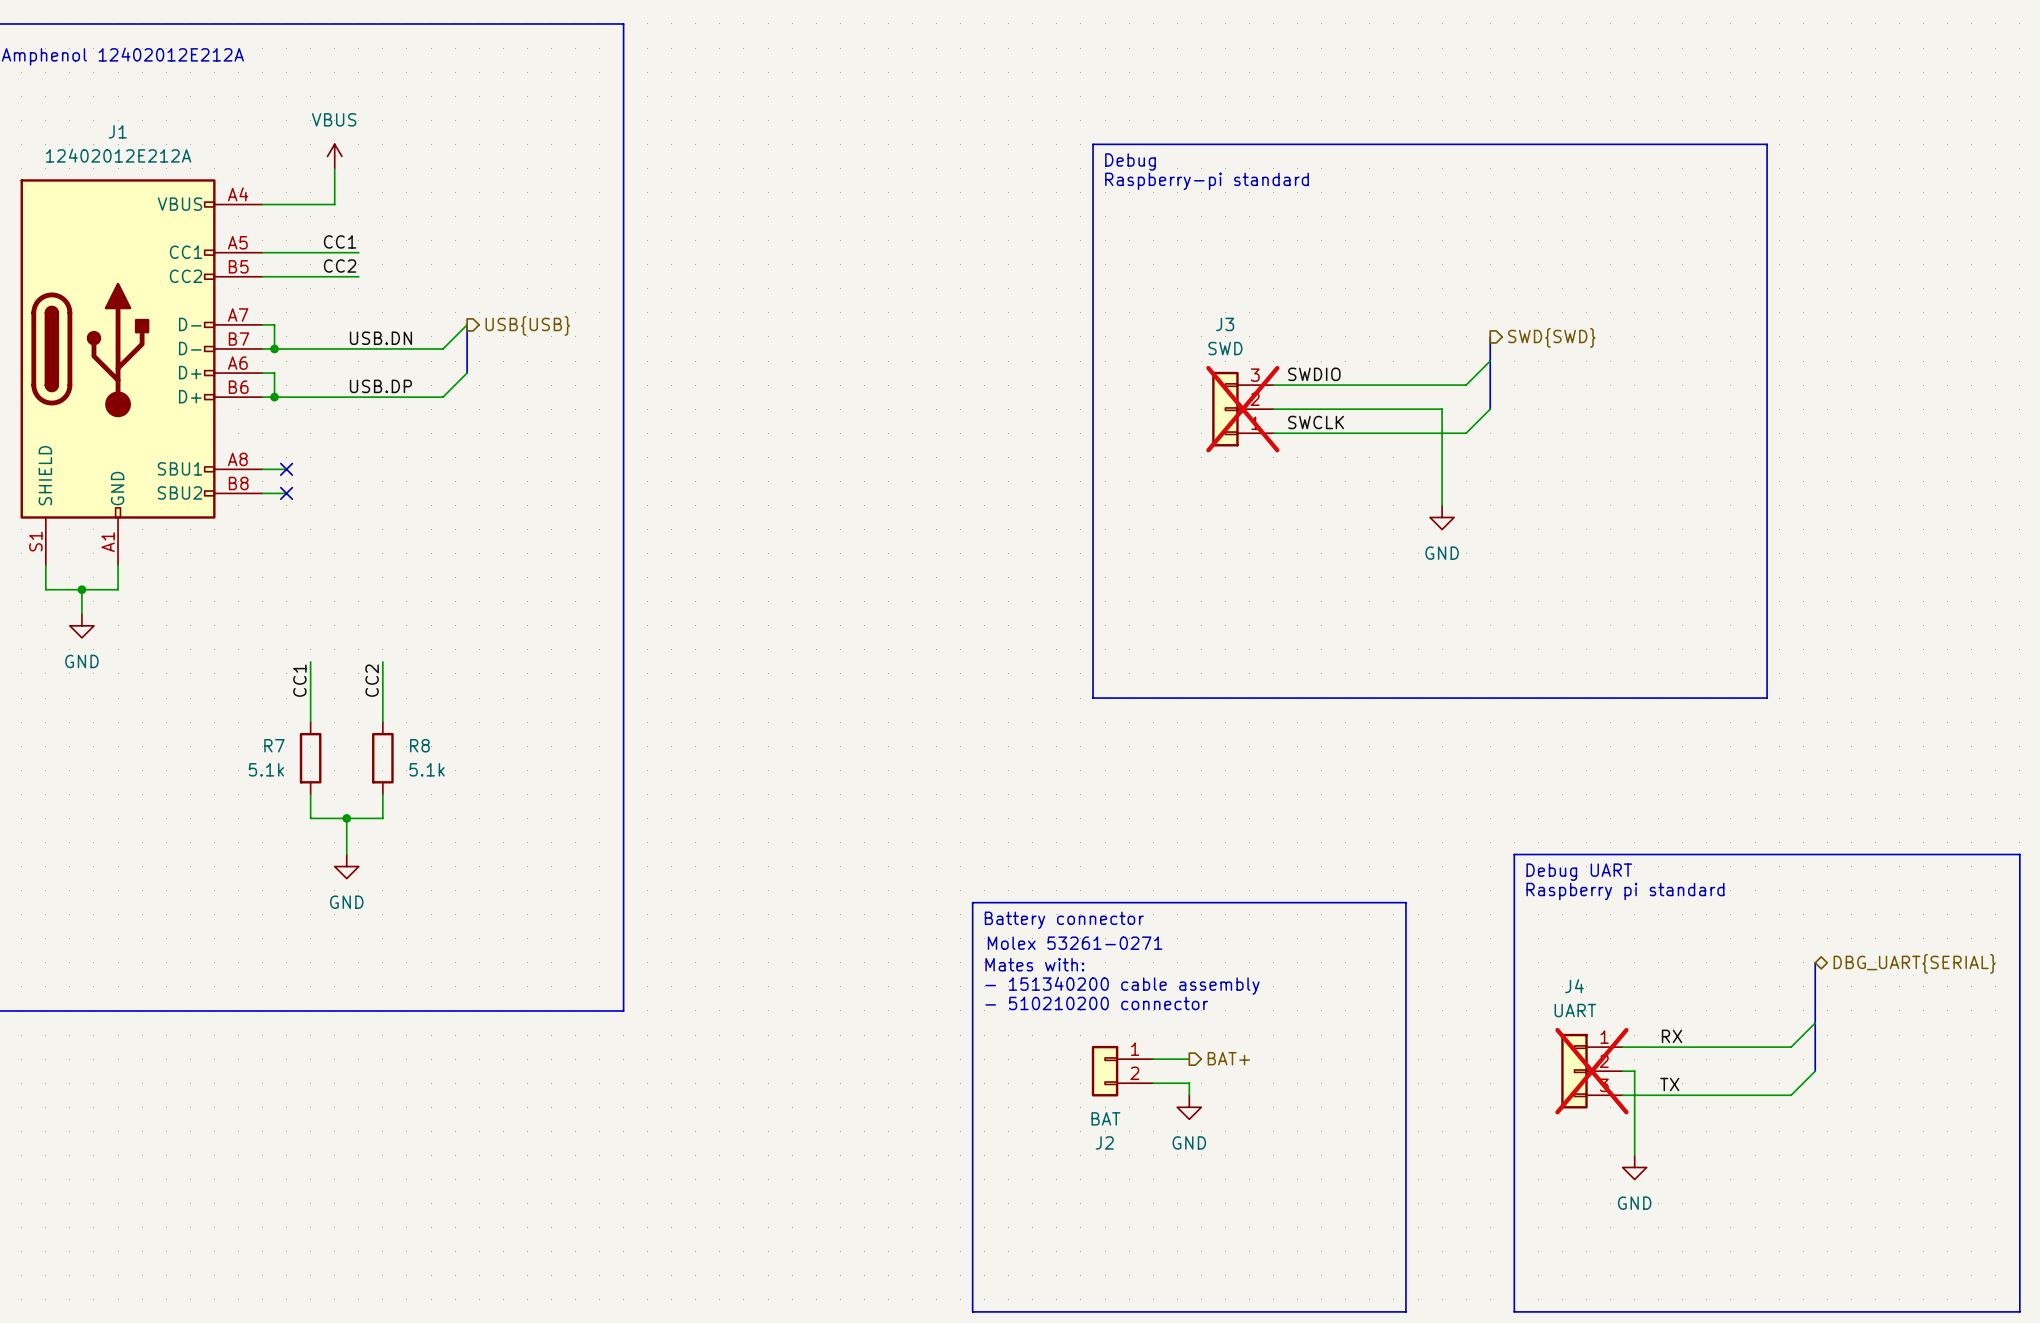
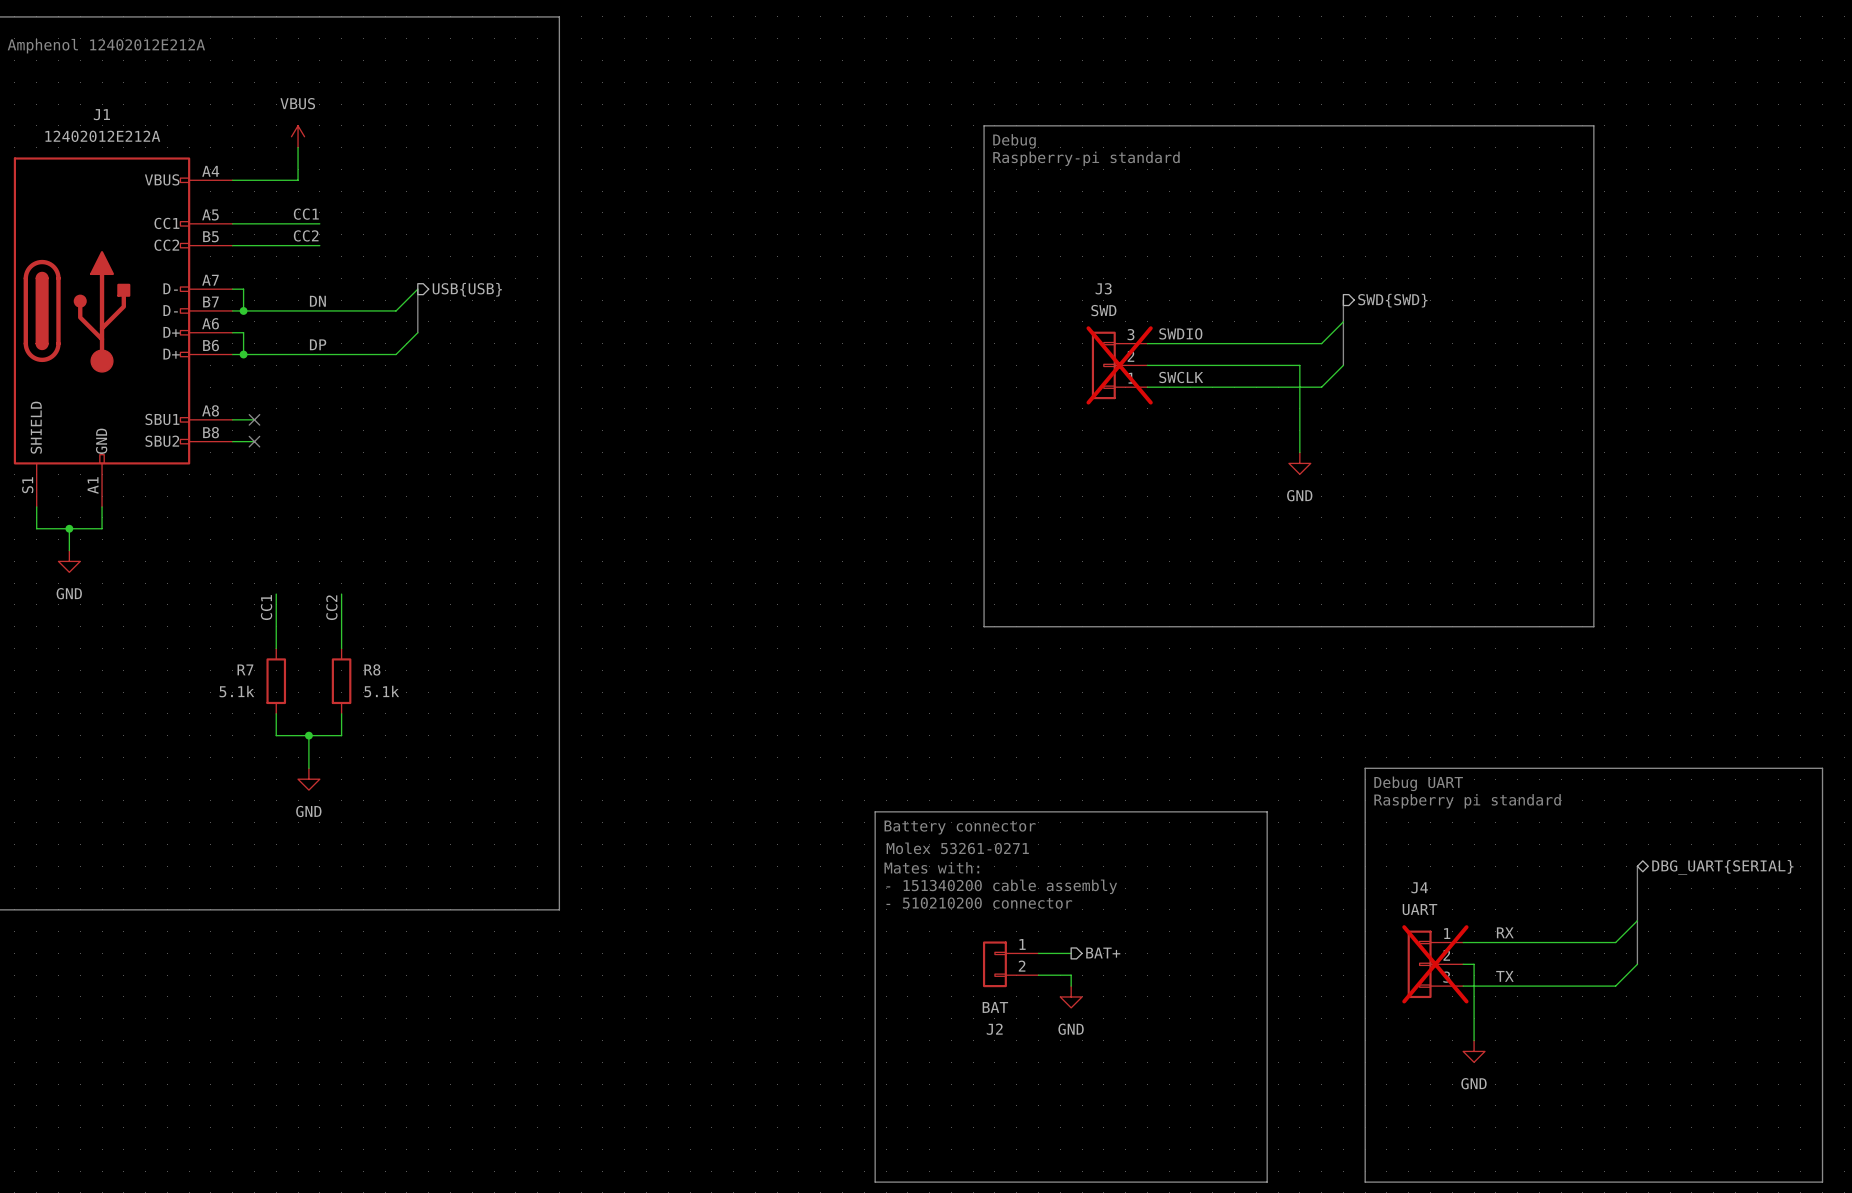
label: USB.DN (380, 338) -> DN (317, 301)
label: USB.DP (380, 386) -> DP (318, 344)

